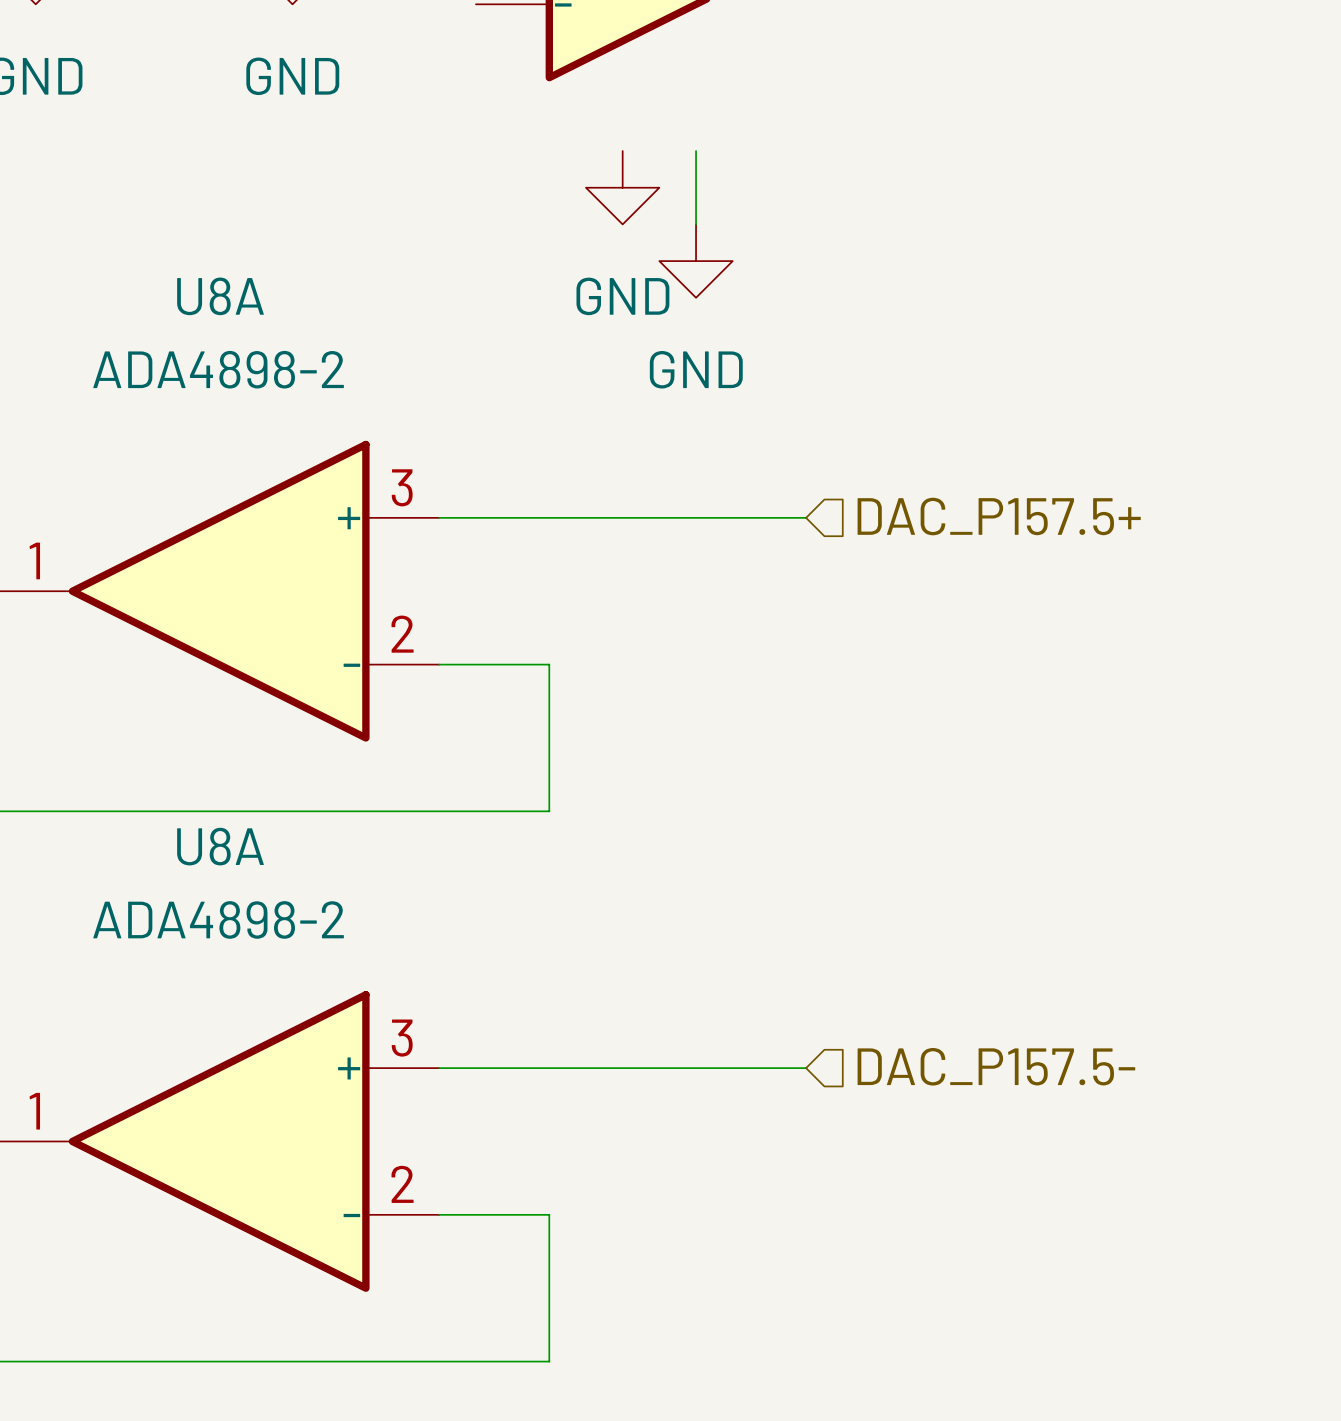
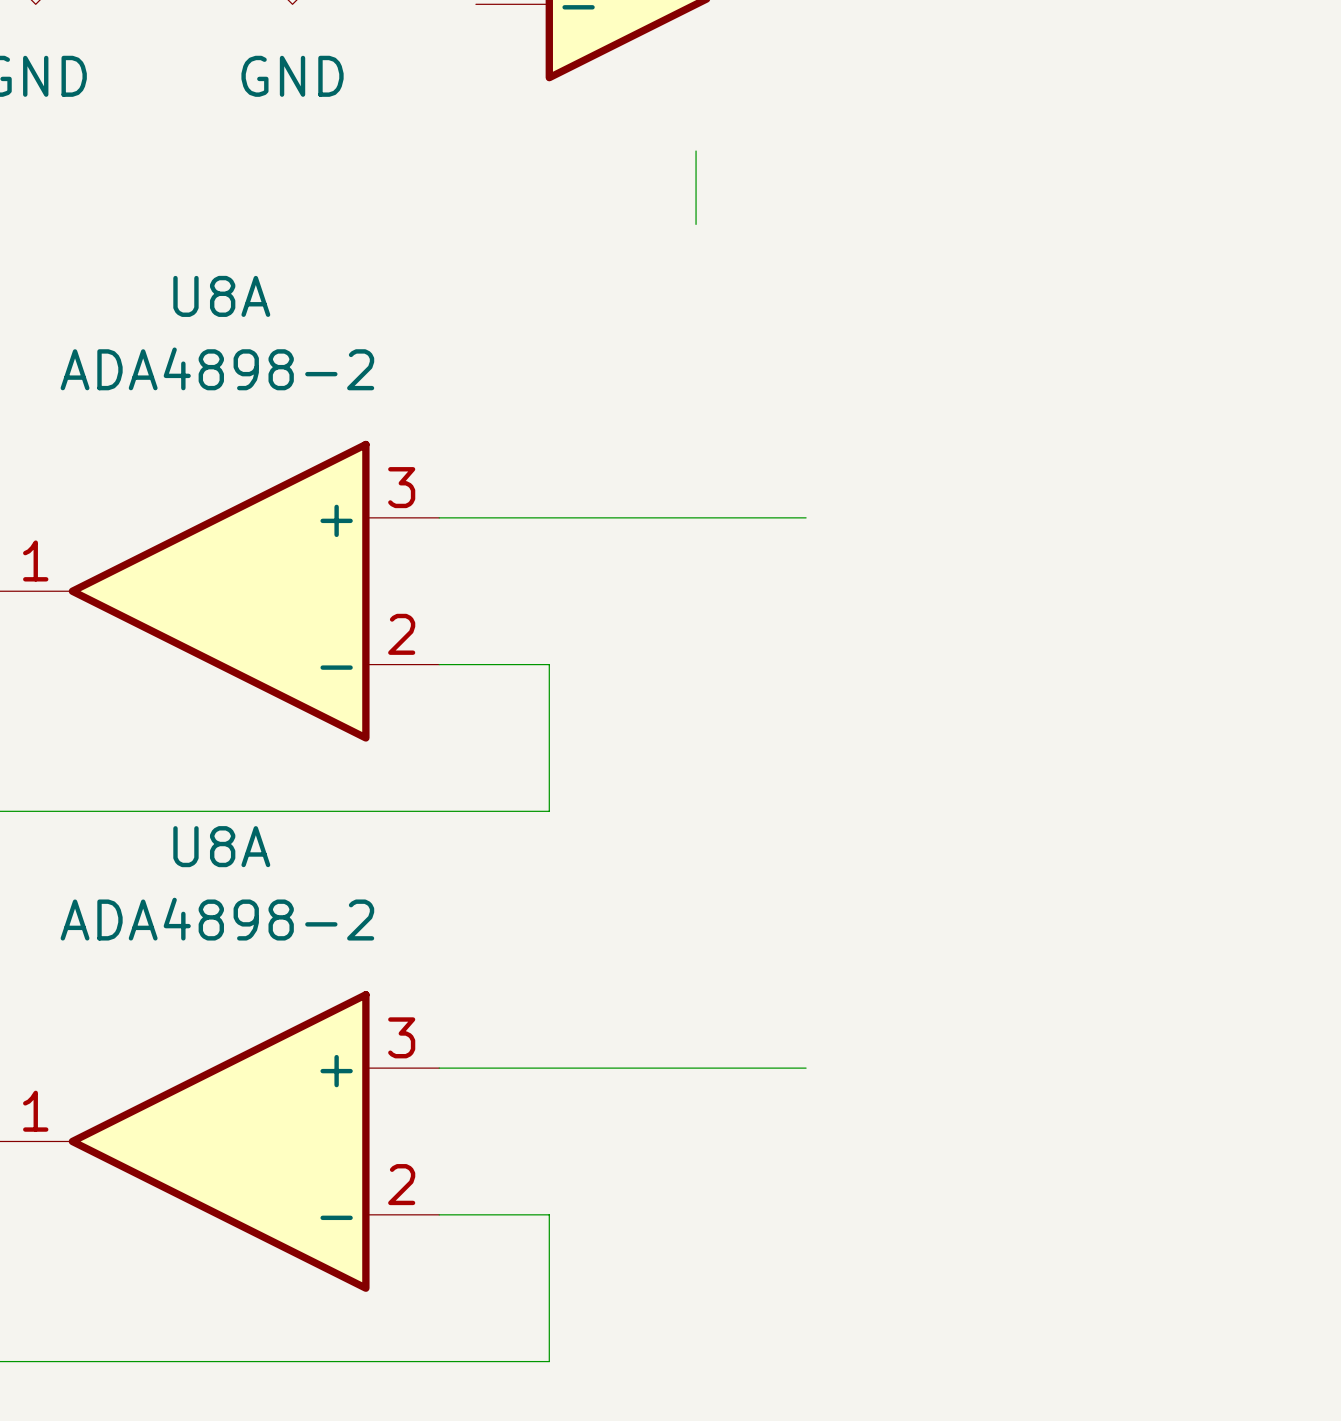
power symbol: GND (622, 187) -> none
power symbol: GND (696, 261) -> none
hierarchical label: DAC_P157.5+ (999, 516) -> none
hierarchical label: DAC_P157.5- (996, 1066) -> none

